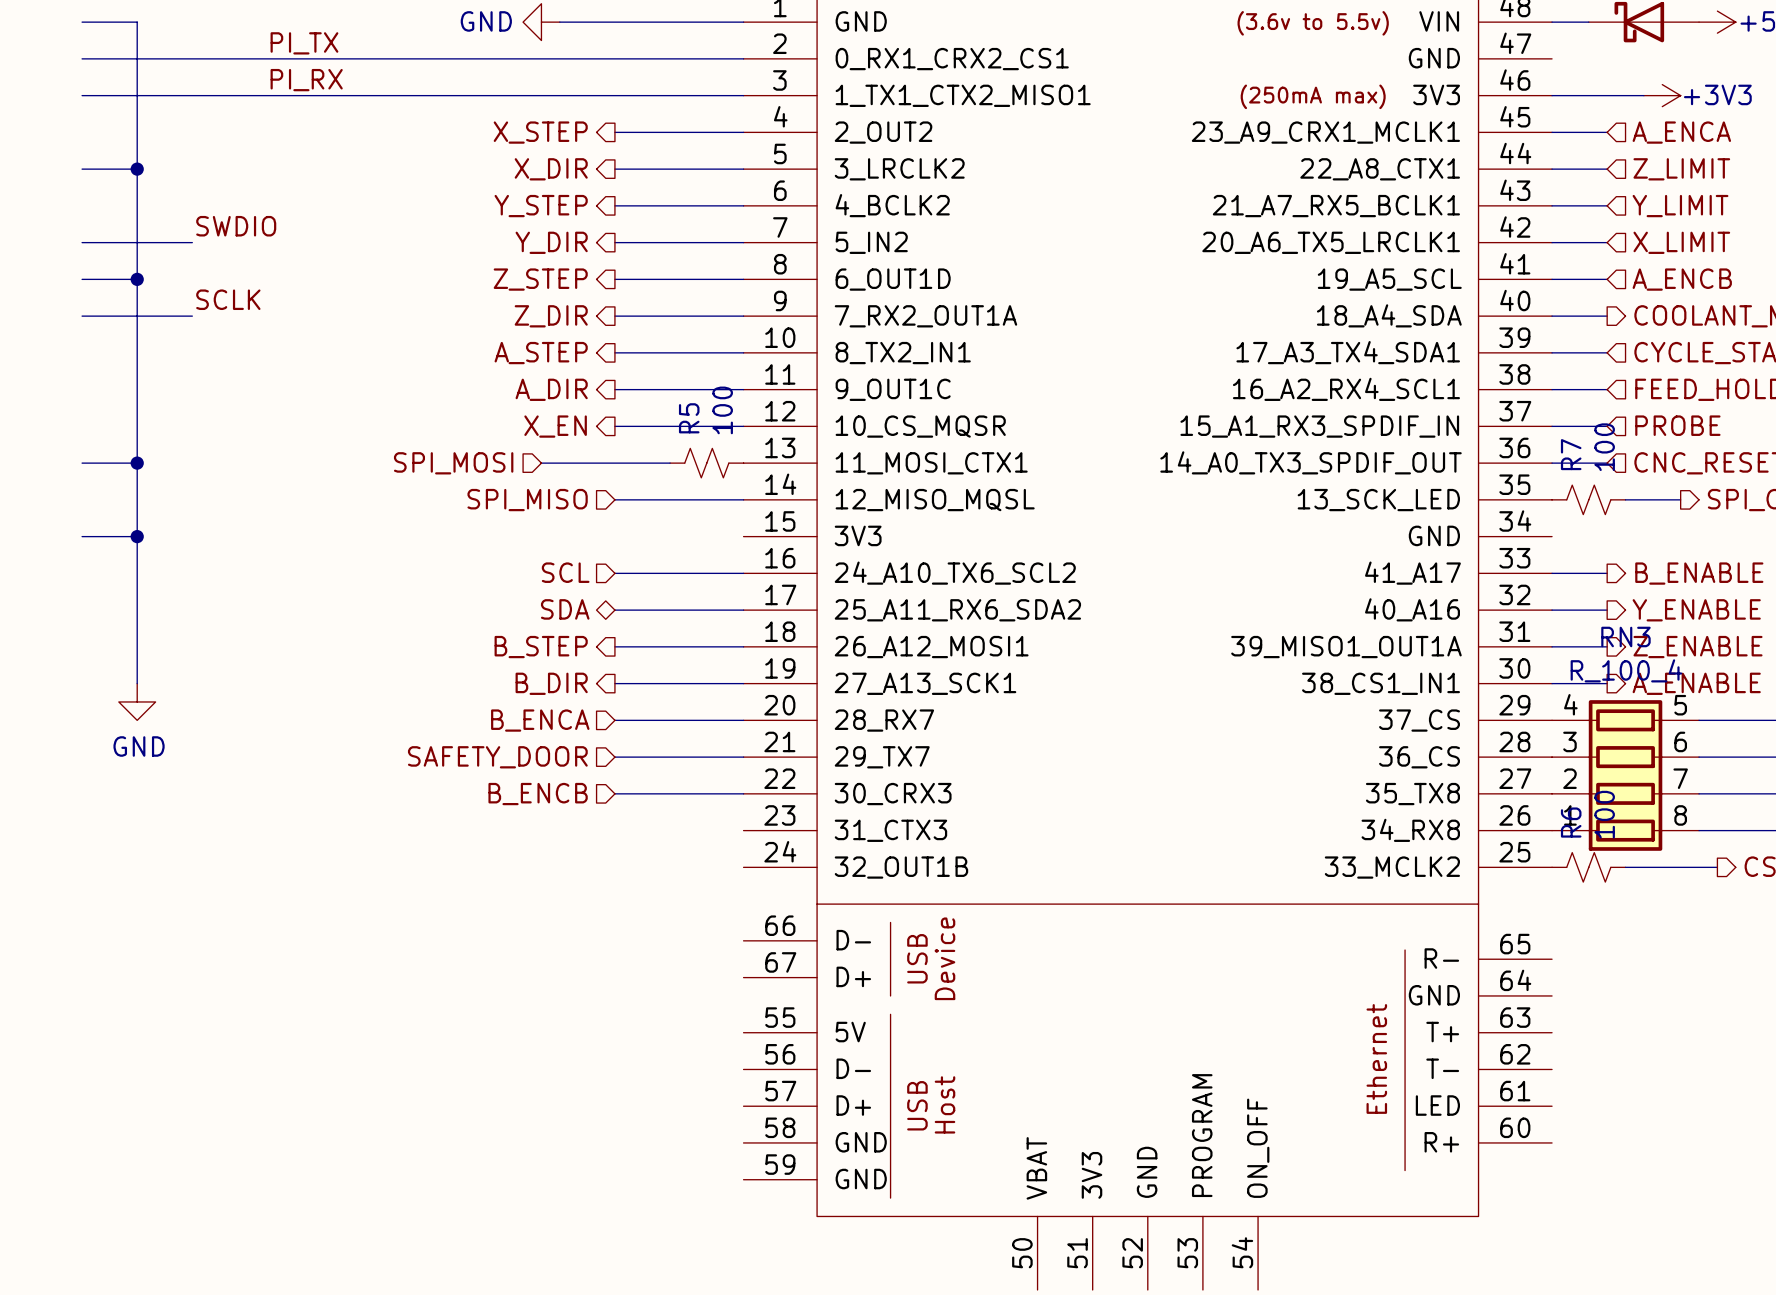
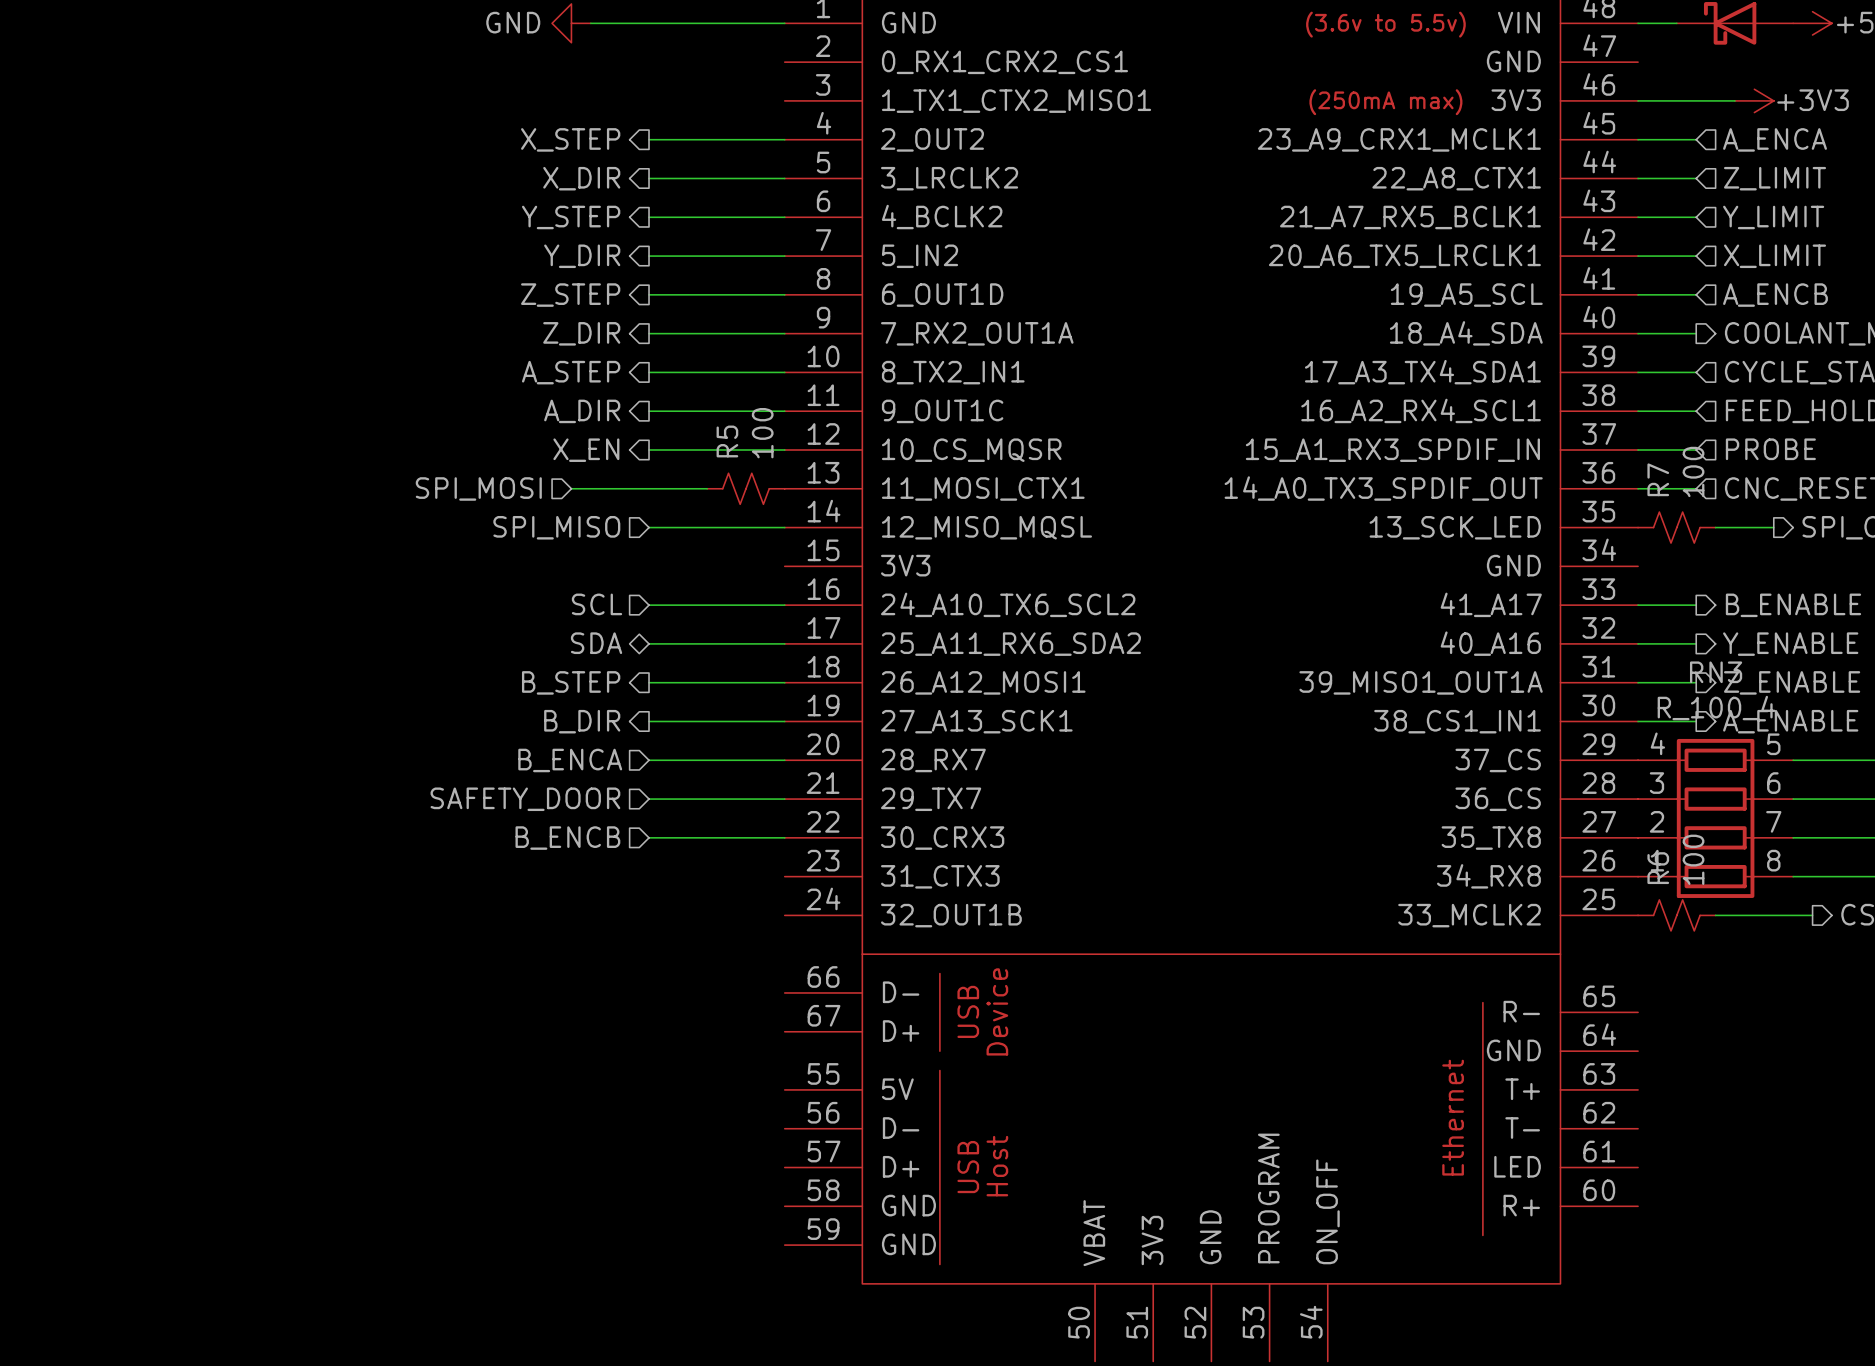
wire: (82, 22) (137, 22) (137, 683) -> none
label: PI_TX (304, 43) -> none
wire: (82, 58) (743, 58) -> none
label: PI_RX (306, 80) -> none
wire: (82, 95) (743, 95) -> none
wire: (82, 169) (137, 169) -> none
junction: (137, 169) -> none
label: SWDIO (236, 226) -> none
wire: (82, 242) (192, 242) -> none
wire: (82, 279) (137, 279) -> none
junction: (137, 279) -> none
label: SCLK (228, 299) -> none
wire: (82, 316) (192, 316) -> none
wire: (82, 463) (137, 463) -> none
junction: (137, 463) -> none
wire: (82, 536) (137, 536) -> none
junction: (137, 536) -> none
power symbol: GND (137, 701) -> none

